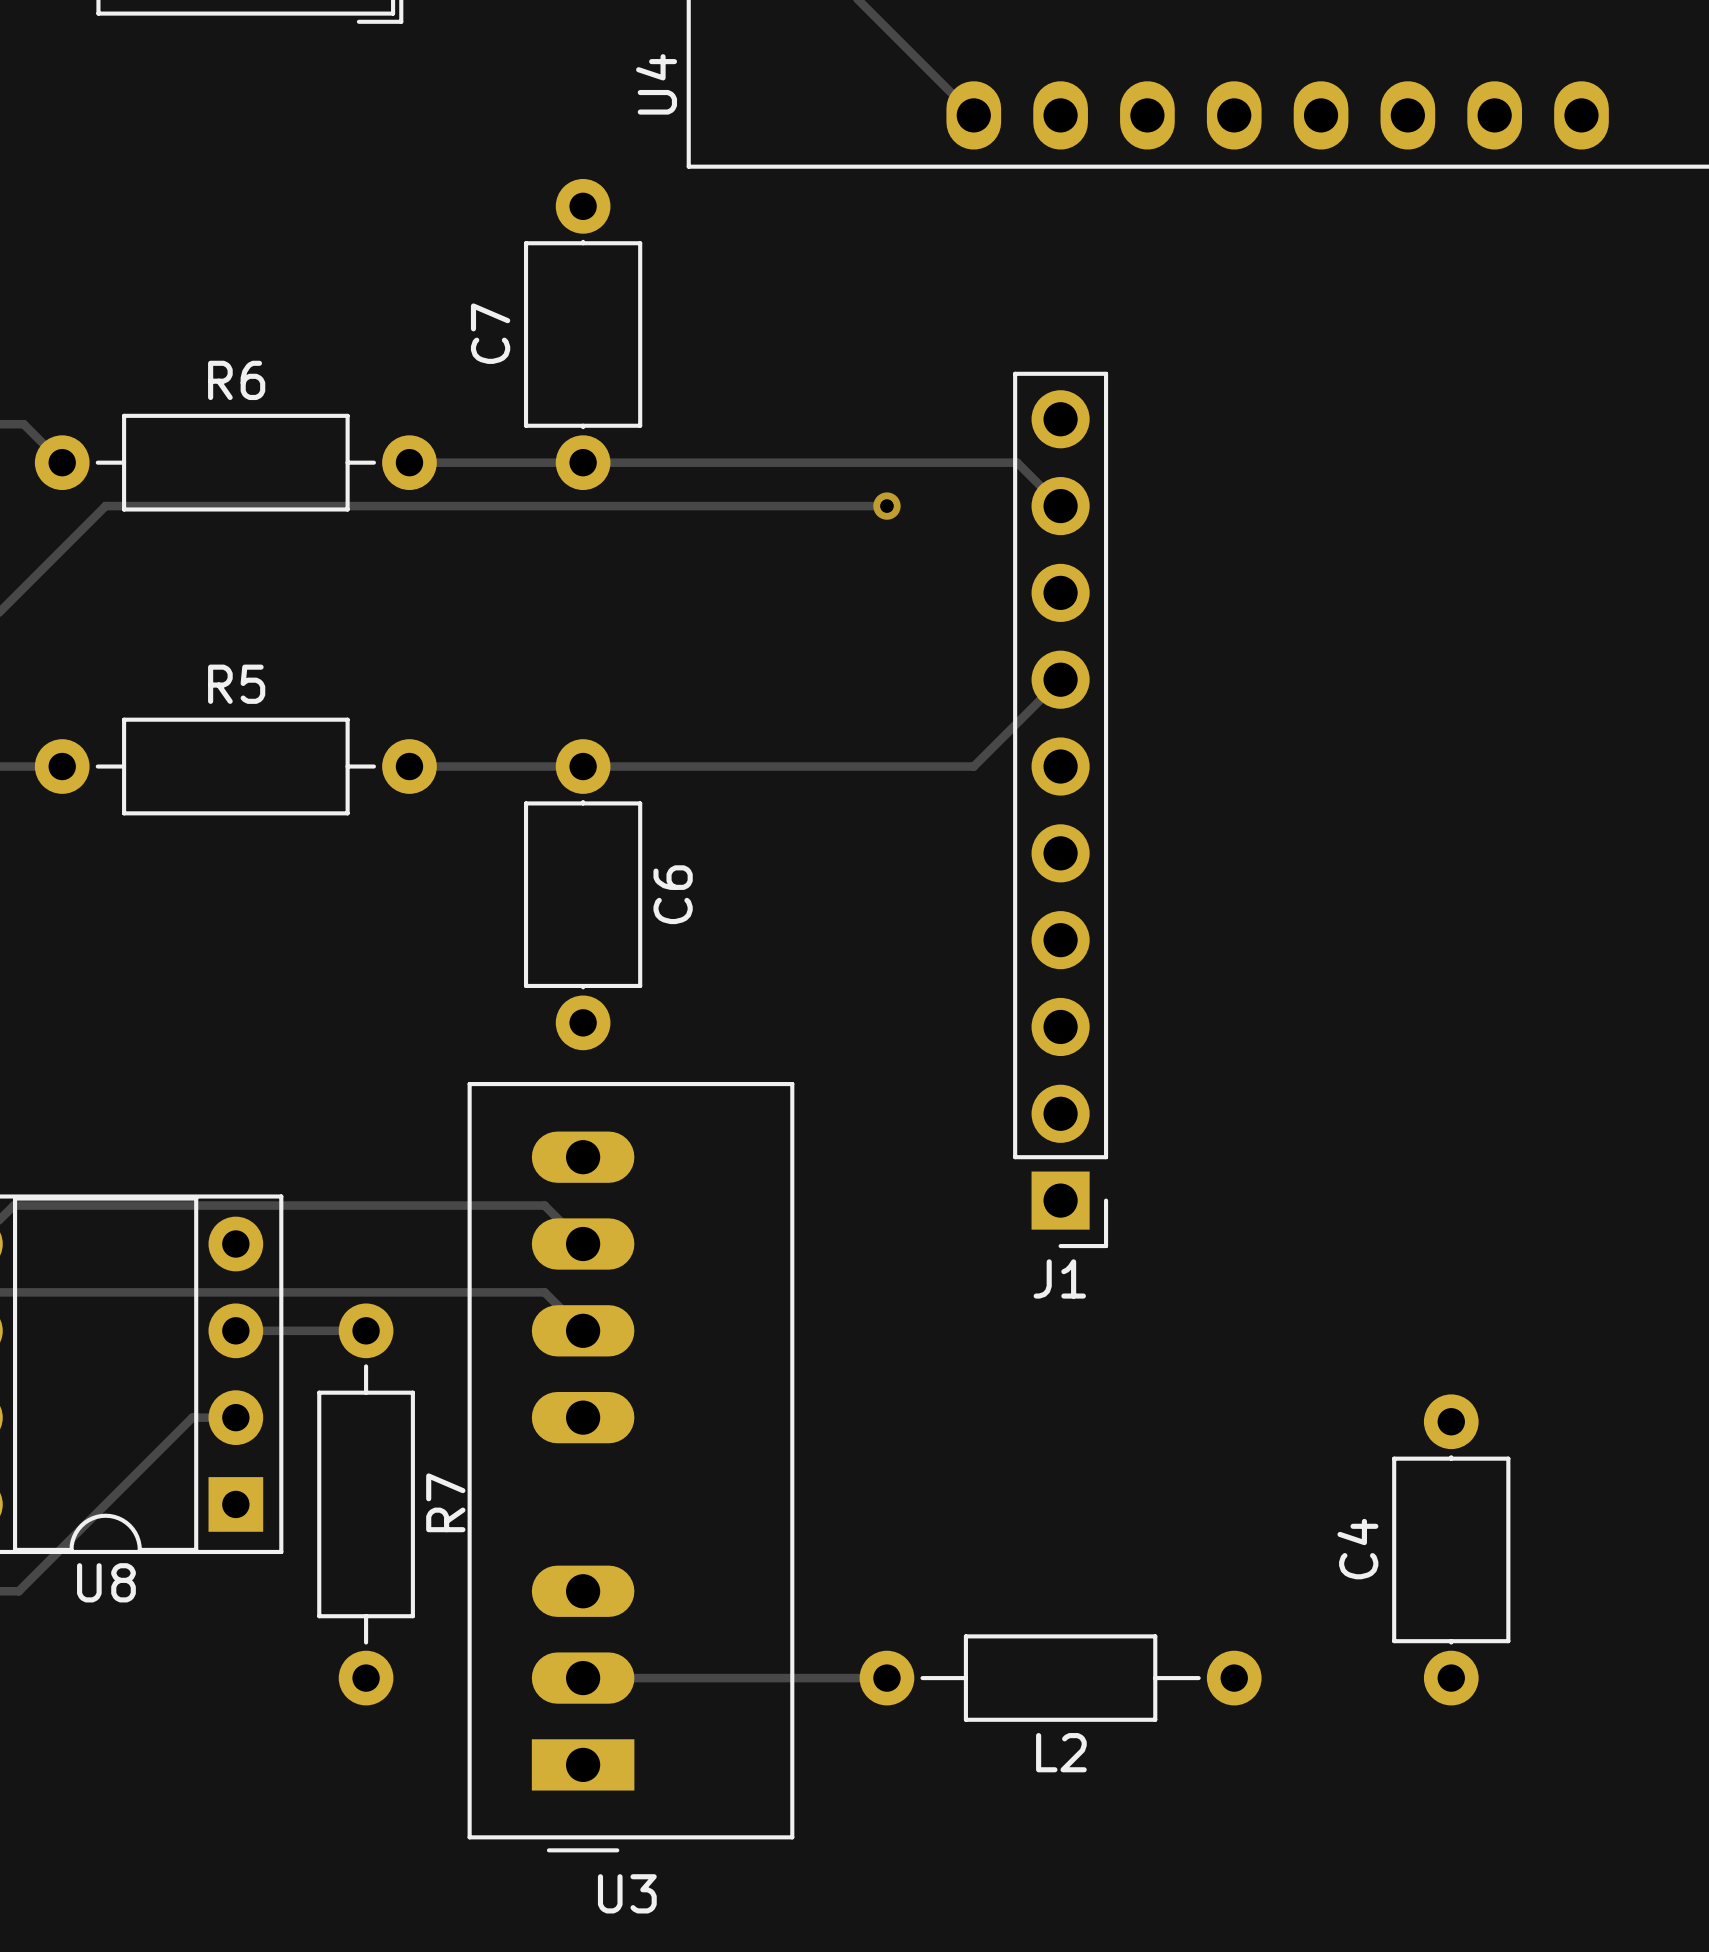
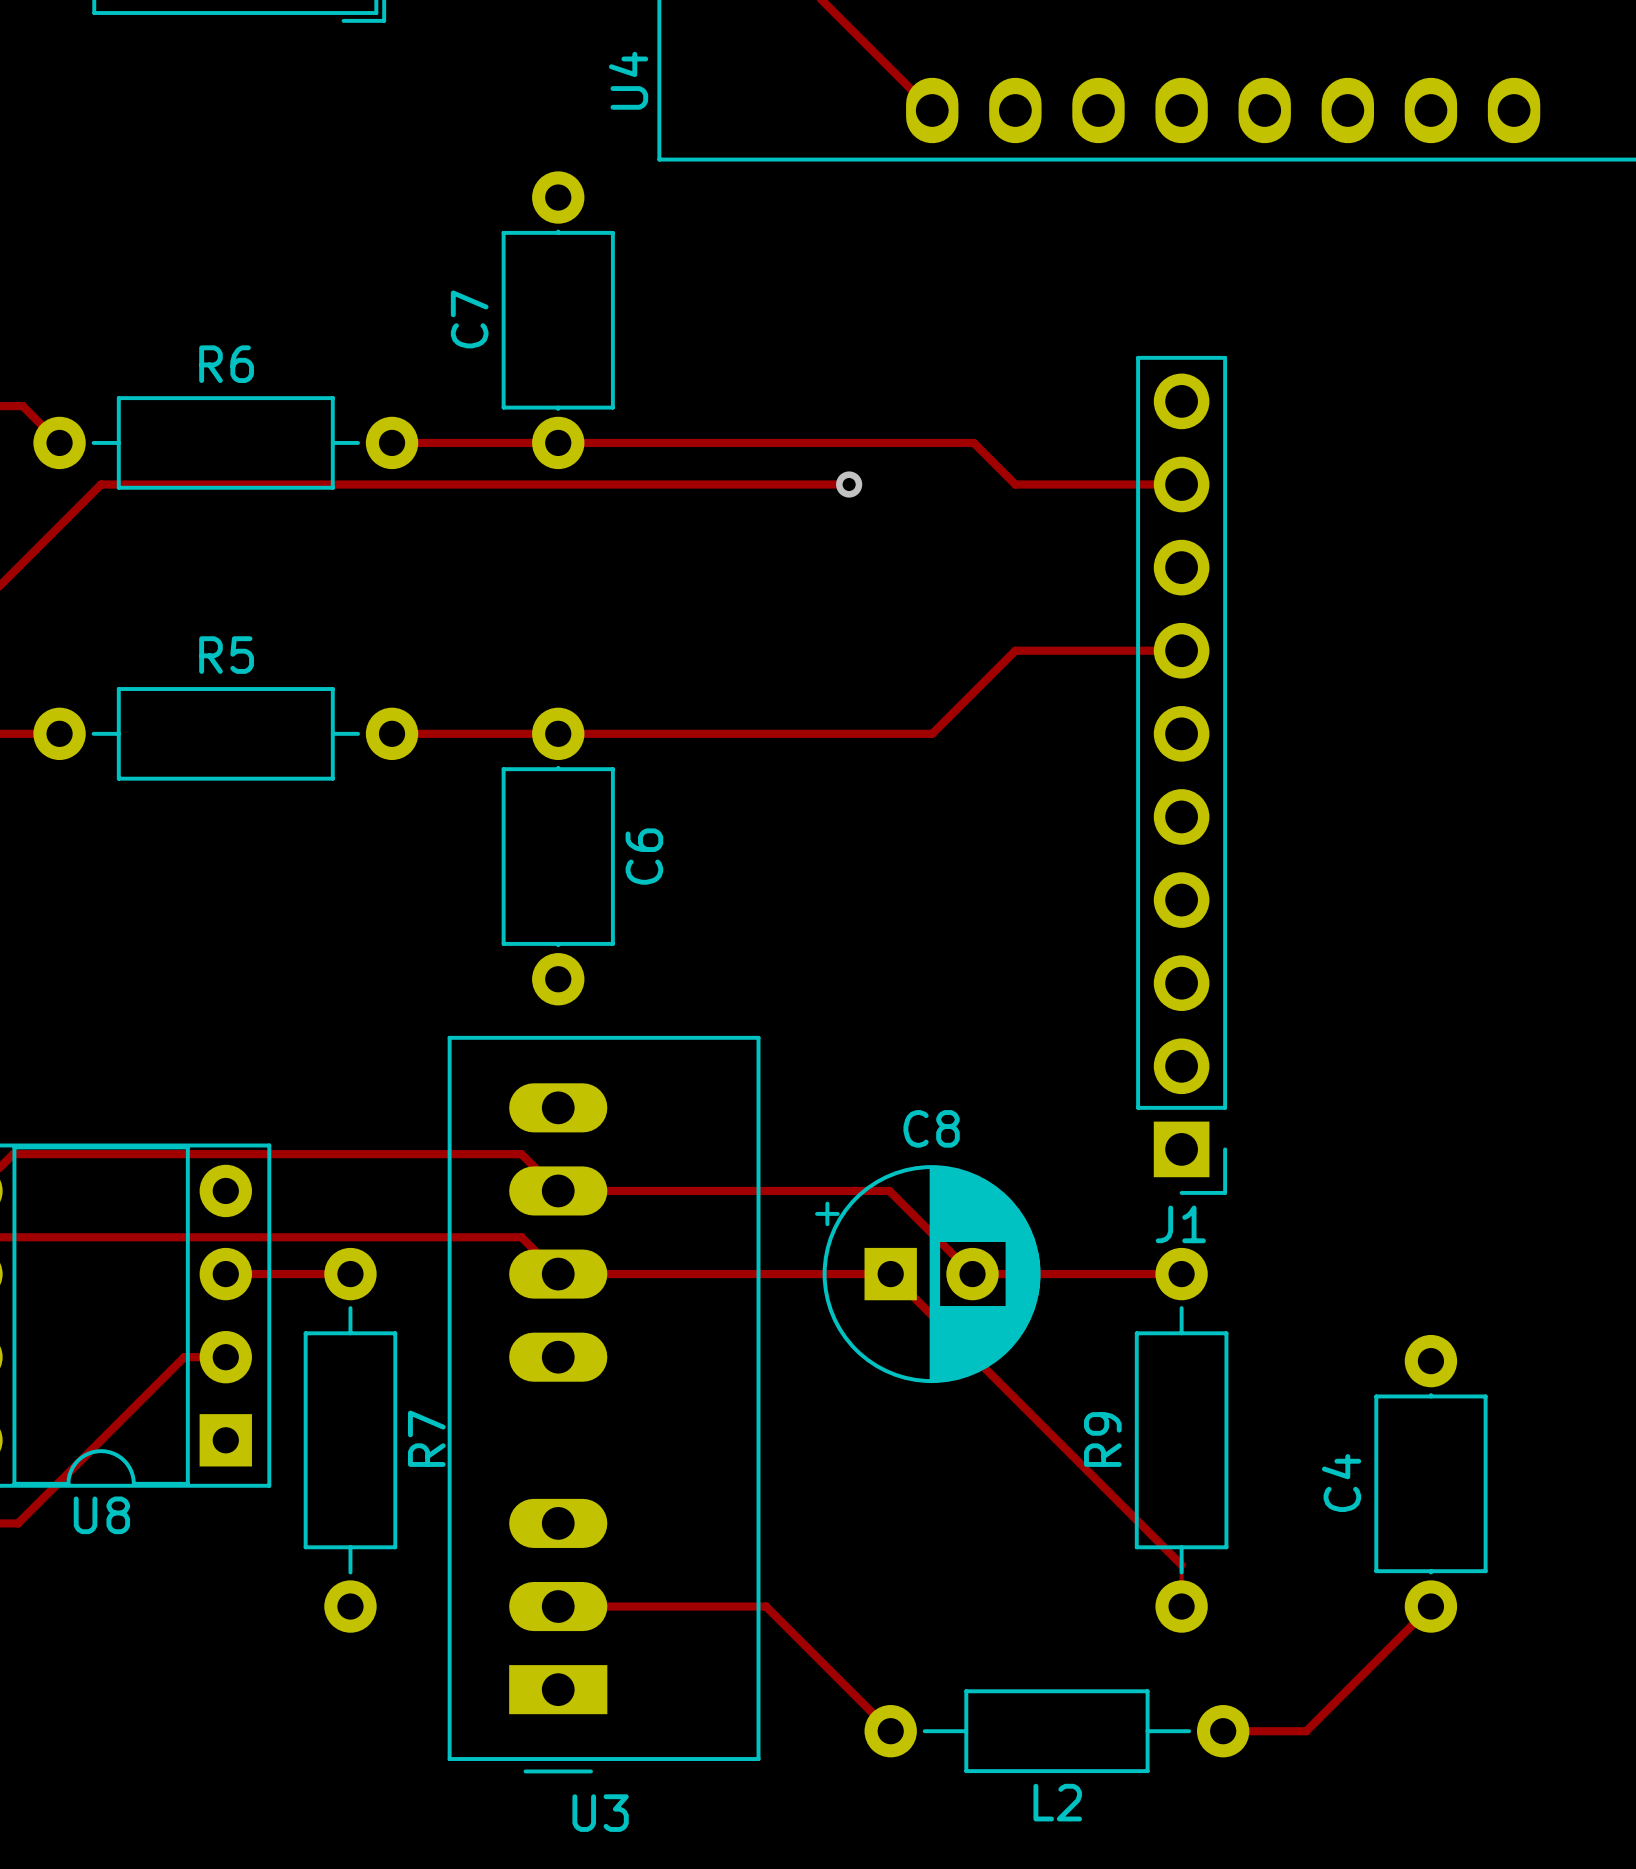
track: none -> (1015, 484) (1181, 484)
track: none -> (1015, 650) (1181, 650)
J1 position: (1060, 809) -> (1181, 775)
track: none -> (558, 1190) (889, 1190) (972, 1274) (1181, 1274)
track: none -> (558, 1274) (890, 1274) (1181, 1564) (1181, 1606)
C8: none -> (927, 1274)
R9: none -> (1181, 1440)
C4 position: (1451, 1549) -> (1430, 1483)
track: (800, 1678) (886, 1678) -> (766, 1606) (890, 1731)
L2 position: (1060, 1678) -> (1056, 1731)
track: none -> (1430, 1606) (1306, 1731) (1223, 1731)

